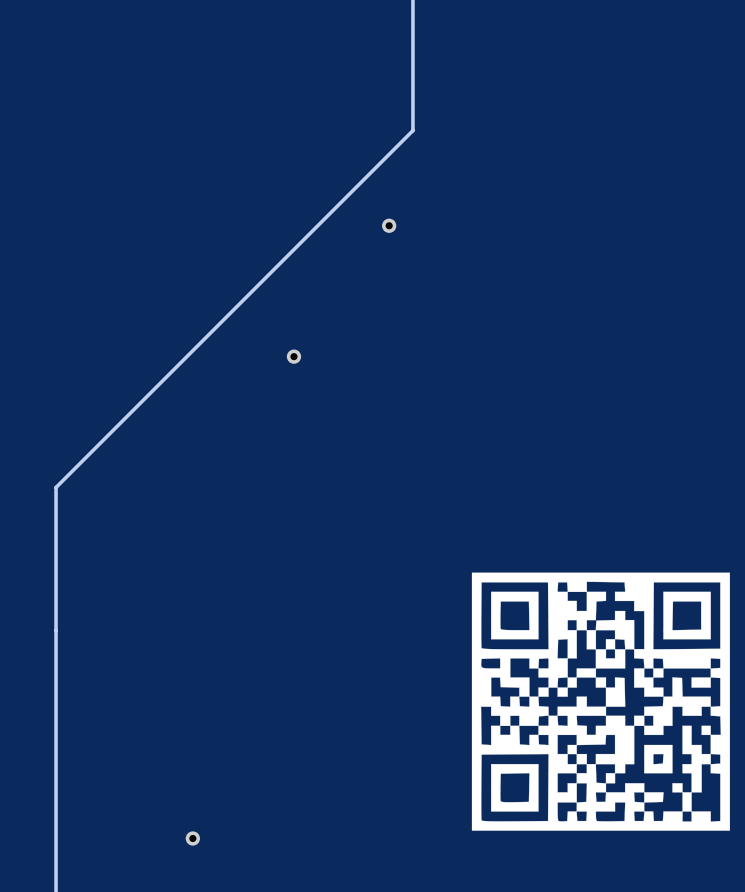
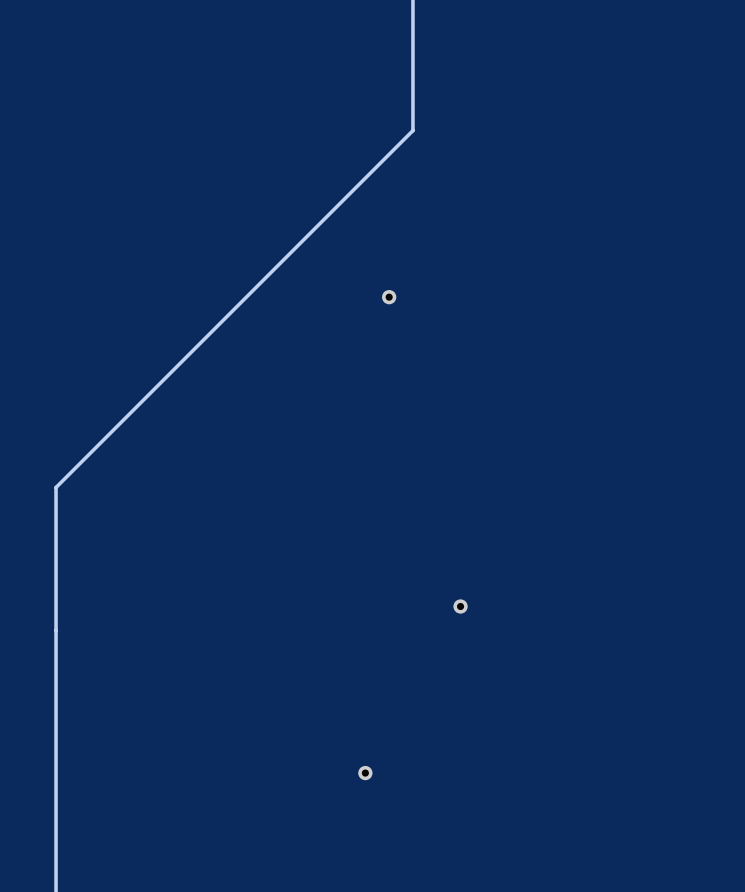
part: (389, 225) -> none
part: none -> (389, 297)
part: (293, 356) -> none
drawing: [471, 572, 731, 831] -> none
part: none -> (460, 606)
part: none -> (365, 773)
part: (192, 838) -> none

